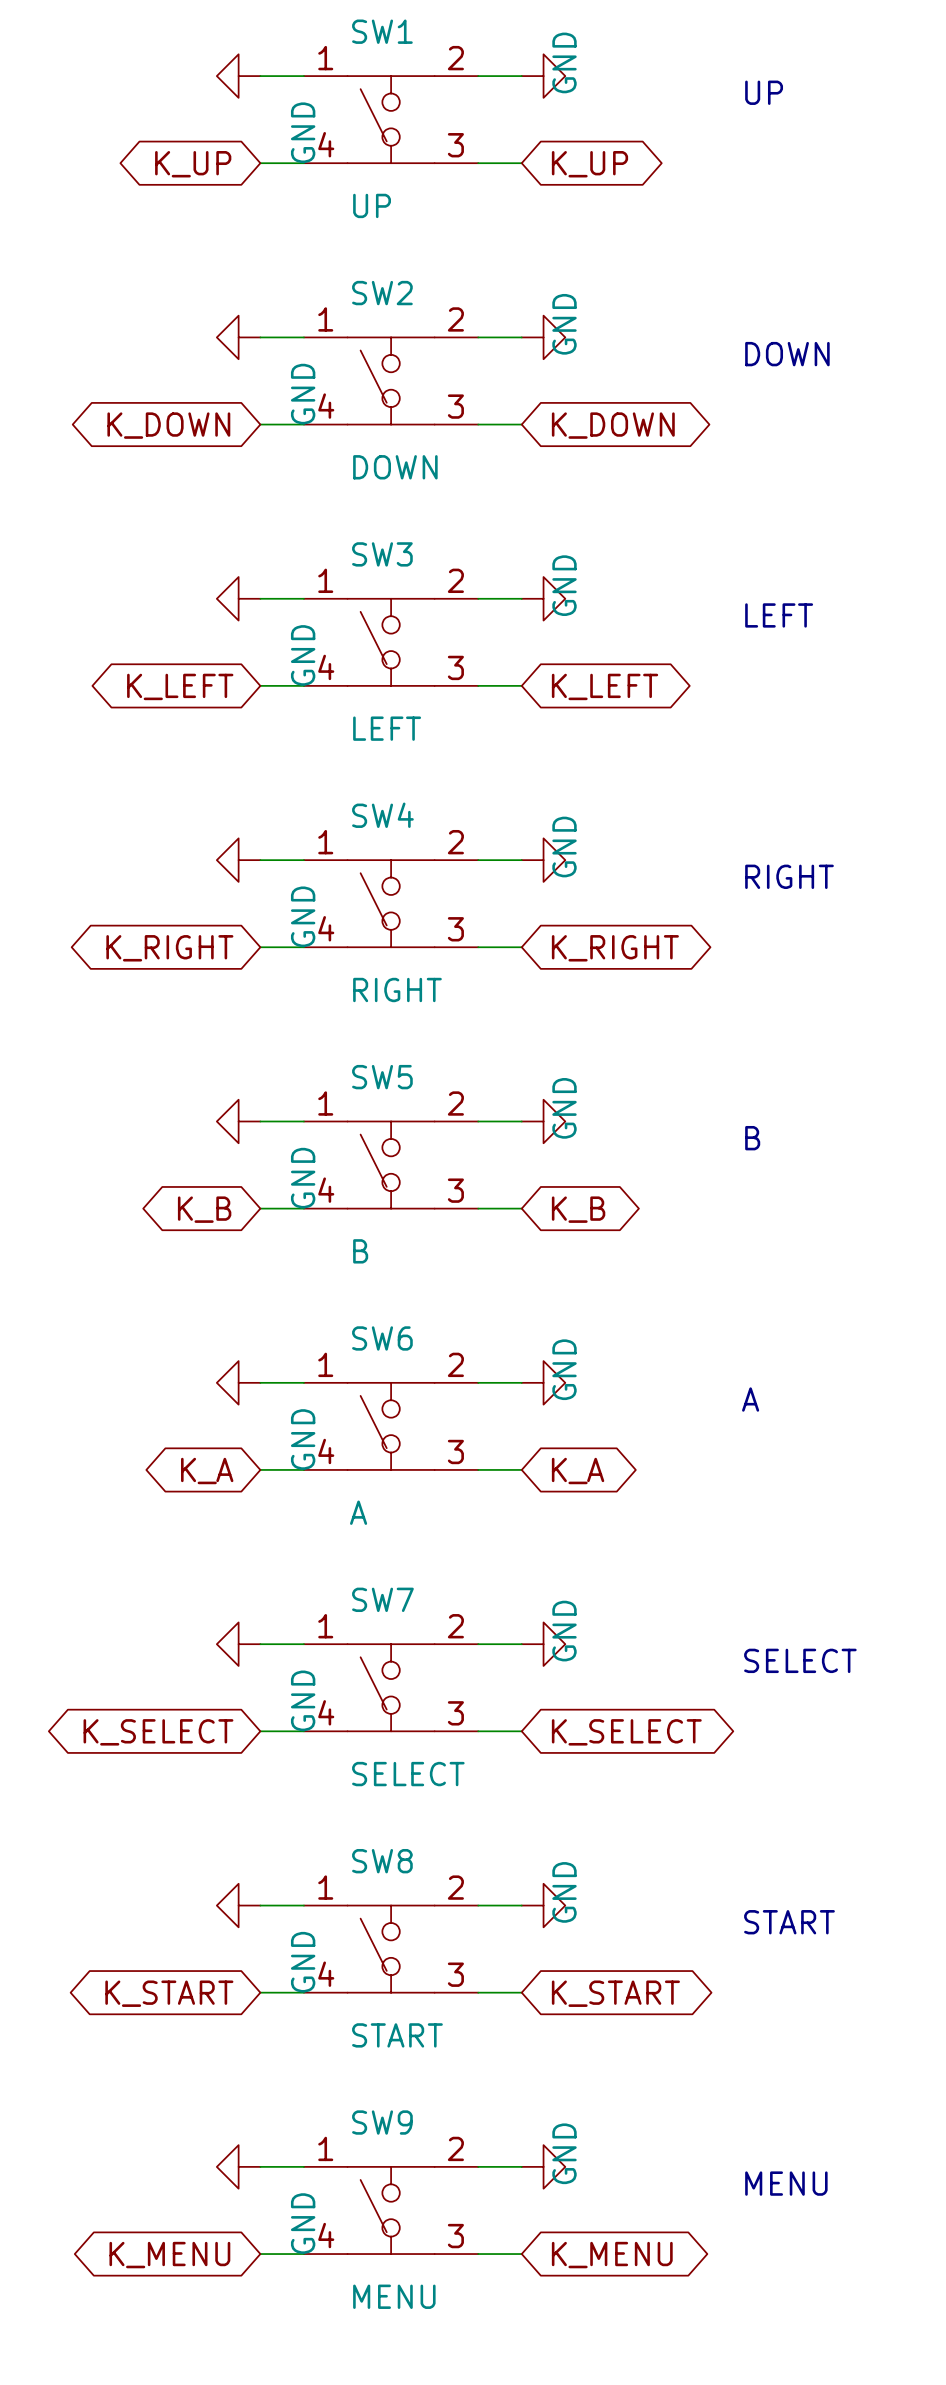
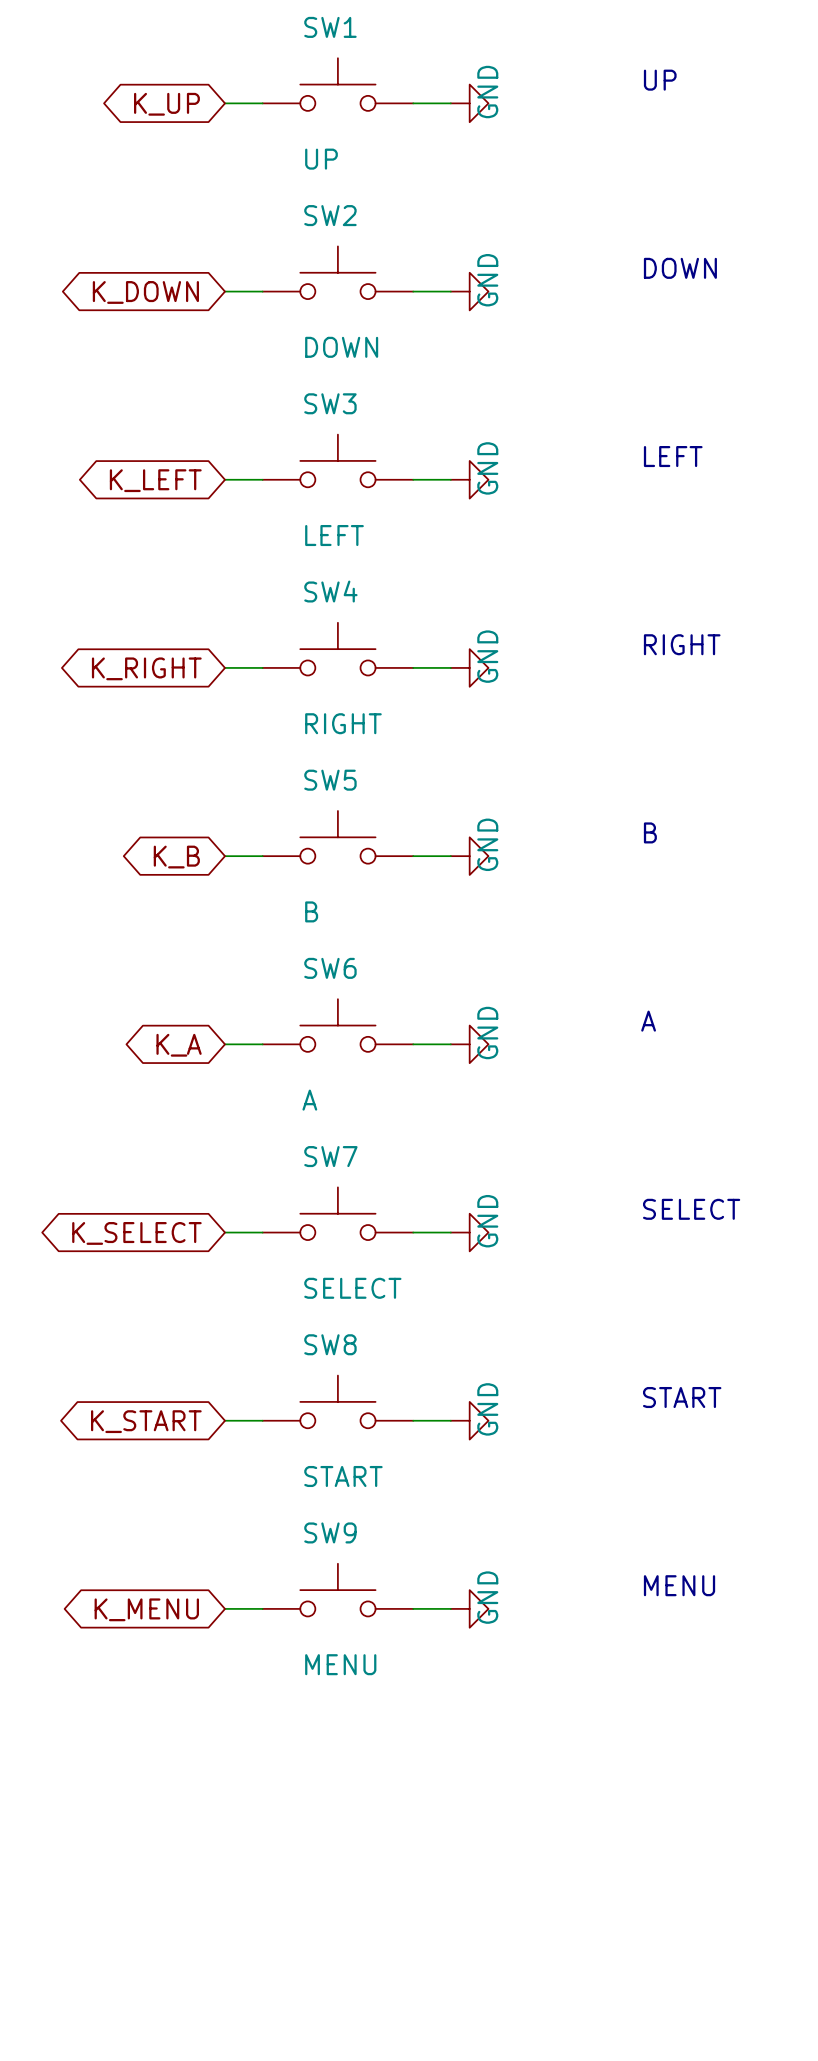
power symbol: GND (238, 76) -> none
wire: (260, 76) (303, 76) -> none
SW1 symbol: [303, 76, 479, 164] -> [262, 58, 414, 111]
wire: (478, 76) (521, 76) -> none
power symbol position: GND (543, 76) -> GND (469, 103)
wire: (260, 163) (303, 163) -> (225, 103) (262, 103)
wire: (478, 163) (521, 163) -> (413, 103) (450, 103)
global label position: K_UP (193, 164) -> K_UP (166, 104)
global label: K_UP (589, 164) -> none
power symbol: GND (238, 337) -> none
SW2 symbol: [303, 337, 479, 425] -> [262, 246, 414, 300]
text position: DOWN (787, 354) -> DOWN (680, 268)
wire: (260, 424) (303, 424) -> none
wire: (478, 424) (521, 424) -> none
global label position: K_DOWN (168, 425) -> K_DOWN (145, 292)
global label: K_DOWN (613, 425) -> none
power symbol: GND (238, 598) -> none
wire: (260, 598) (303, 598) -> (225, 479) (262, 479)
SW3 symbol: [303, 598, 479, 686] -> [262, 434, 414, 488]
wire: (478, 598) (521, 598) -> (413, 479) (450, 479)
power symbol position: GND (543, 598) -> GND (469, 479)
text position: LEFT (779, 615) -> LEFT (673, 456)
wire: (260, 685) (303, 685) -> (225, 667) (262, 667)
wire: (478, 685) (521, 685) -> (413, 667) (450, 667)
global label position: K_LEFT (180, 686) -> K_LEFT (155, 480)
global label: K_LEFT (605, 686) -> none
power symbol: none -> GND (469, 667)
global label: none -> K_RIGHT (146, 668)
power symbol: GND (238, 860) -> none
wire: (260, 860) (303, 860) -> none
SW4 symbol: [303, 860, 479, 948] -> [262, 622, 414, 676]
wire: (478, 860) (521, 860) -> none
power symbol: GND (543, 860) -> none
text position: RIGHT (789, 876) -> RIGHT (682, 644)
wire: (260, 947) (303, 947) -> (225, 856) (262, 856)
wire: (478, 947) (521, 947) -> (413, 856) (450, 856)
global label: K_RIGHT (169, 948) -> none
global label: K_RIGHT (615, 948) -> none
power symbol: none -> GND (469, 856)
power symbol: GND (238, 1121) -> none
wire: (260, 1121) (303, 1121) -> none
SW5 symbol: [303, 1121, 479, 1209] -> [262, 810, 414, 864]
wire: (478, 1121) (521, 1121) -> none
power symbol: GND (543, 1121) -> none
text position: B (752, 1138) -> B (650, 832)
text: none -> A (648, 1021)
power symbol: none -> GND (469, 1044)
global label: K_B (204, 1209) -> K_A (179, 1045)
global label rotation: 0° (578, 1209) -> 180° (176, 857)
global label position: K_B (578, 1209) -> K_B (176, 857)
power symbol: GND (238, 1382) -> none
wire: (260, 1382) (303, 1382) -> none
SW6 symbol: [303, 1382, 479, 1470] -> [262, 999, 414, 1052]
wire: (478, 1382) (521, 1382) -> none
power symbol position: GND (543, 1382) -> GND (469, 1232)
text: A (750, 1399) -> SELECT (691, 1209)
global label: none -> K_SELECT (136, 1233)
wire: (260, 1469) (303, 1469) -> (225, 1232) (262, 1232)
wire: (478, 1469) (521, 1469) -> (413, 1232) (450, 1232)
global label: K_A (207, 1471) -> none
global label: K_A (578, 1471) -> none
power symbol: GND (238, 1644) -> none
SW7 symbol: [303, 1644, 479, 1732] -> [262, 1187, 414, 1241]
global label: none -> K_START (146, 1421)
text: SELECT (800, 1660) -> none
wire: (260, 1731) (303, 1731) -> none
wire: (478, 1731) (521, 1731) -> none
global label: K_SELECT (158, 1732) -> none
global label: K_SELECT (626, 1732) -> none
global label: none -> K_MENU (146, 1609)
power symbol: GND (238, 1905) -> none
wire: (260, 1905) (303, 1905) -> (225, 1608) (262, 1608)
SW8 symbol: [303, 1905, 479, 1993] -> [262, 1375, 414, 1429]
wire: (478, 1905) (521, 1905) -> (413, 1608) (450, 1608)
power symbol position: GND (543, 1905) -> GND (469, 1608)
text position: START (789, 1922) -> START (682, 1397)
wire: (260, 1992) (303, 1992) -> none
wire: (478, 1992) (521, 1992) -> none
global label: K_START (169, 1993) -> none
global label: K_START (615, 1993) -> none
power symbol: GND (238, 2166) -> none
wire: (260, 2166) (303, 2166) -> none
SW9 symbol: [303, 2166, 479, 2255] -> [262, 1563, 414, 1617]
wire: (478, 2166) (521, 2166) -> none
power symbol: GND (543, 2166) -> none
text position: MENU (786, 2183) -> MENU (679, 1585)
wire: (260, 2254) (303, 2254) -> none
wire: (478, 2254) (521, 2254) -> none
global label: K_MENU (169, 2255) -> none
global label: K_MENU (612, 2255) -> none

